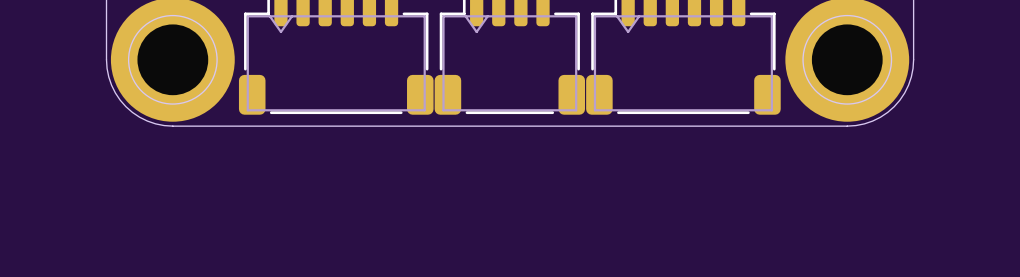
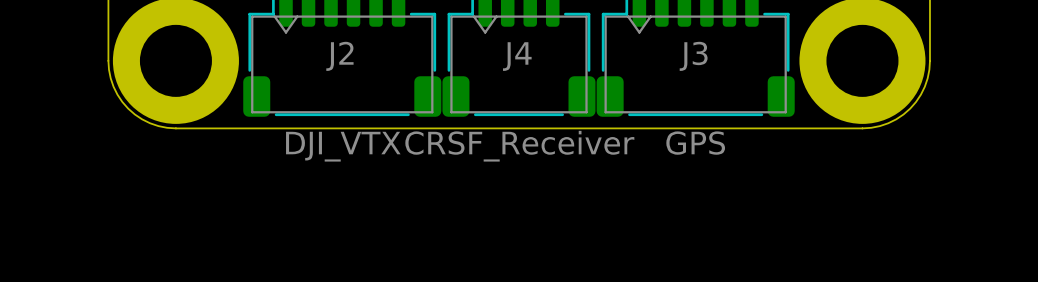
J4 name: none -> J4 (517, 56)
J2 name: none -> J2 (339, 56)
J3 name: none -> J3 (693, 56)
J3 value: none -> GPS (695, 143)
J2 value: none -> DJI_VTX (343, 146)
J4 value: none -> CRSF_Receiver (519, 146)

